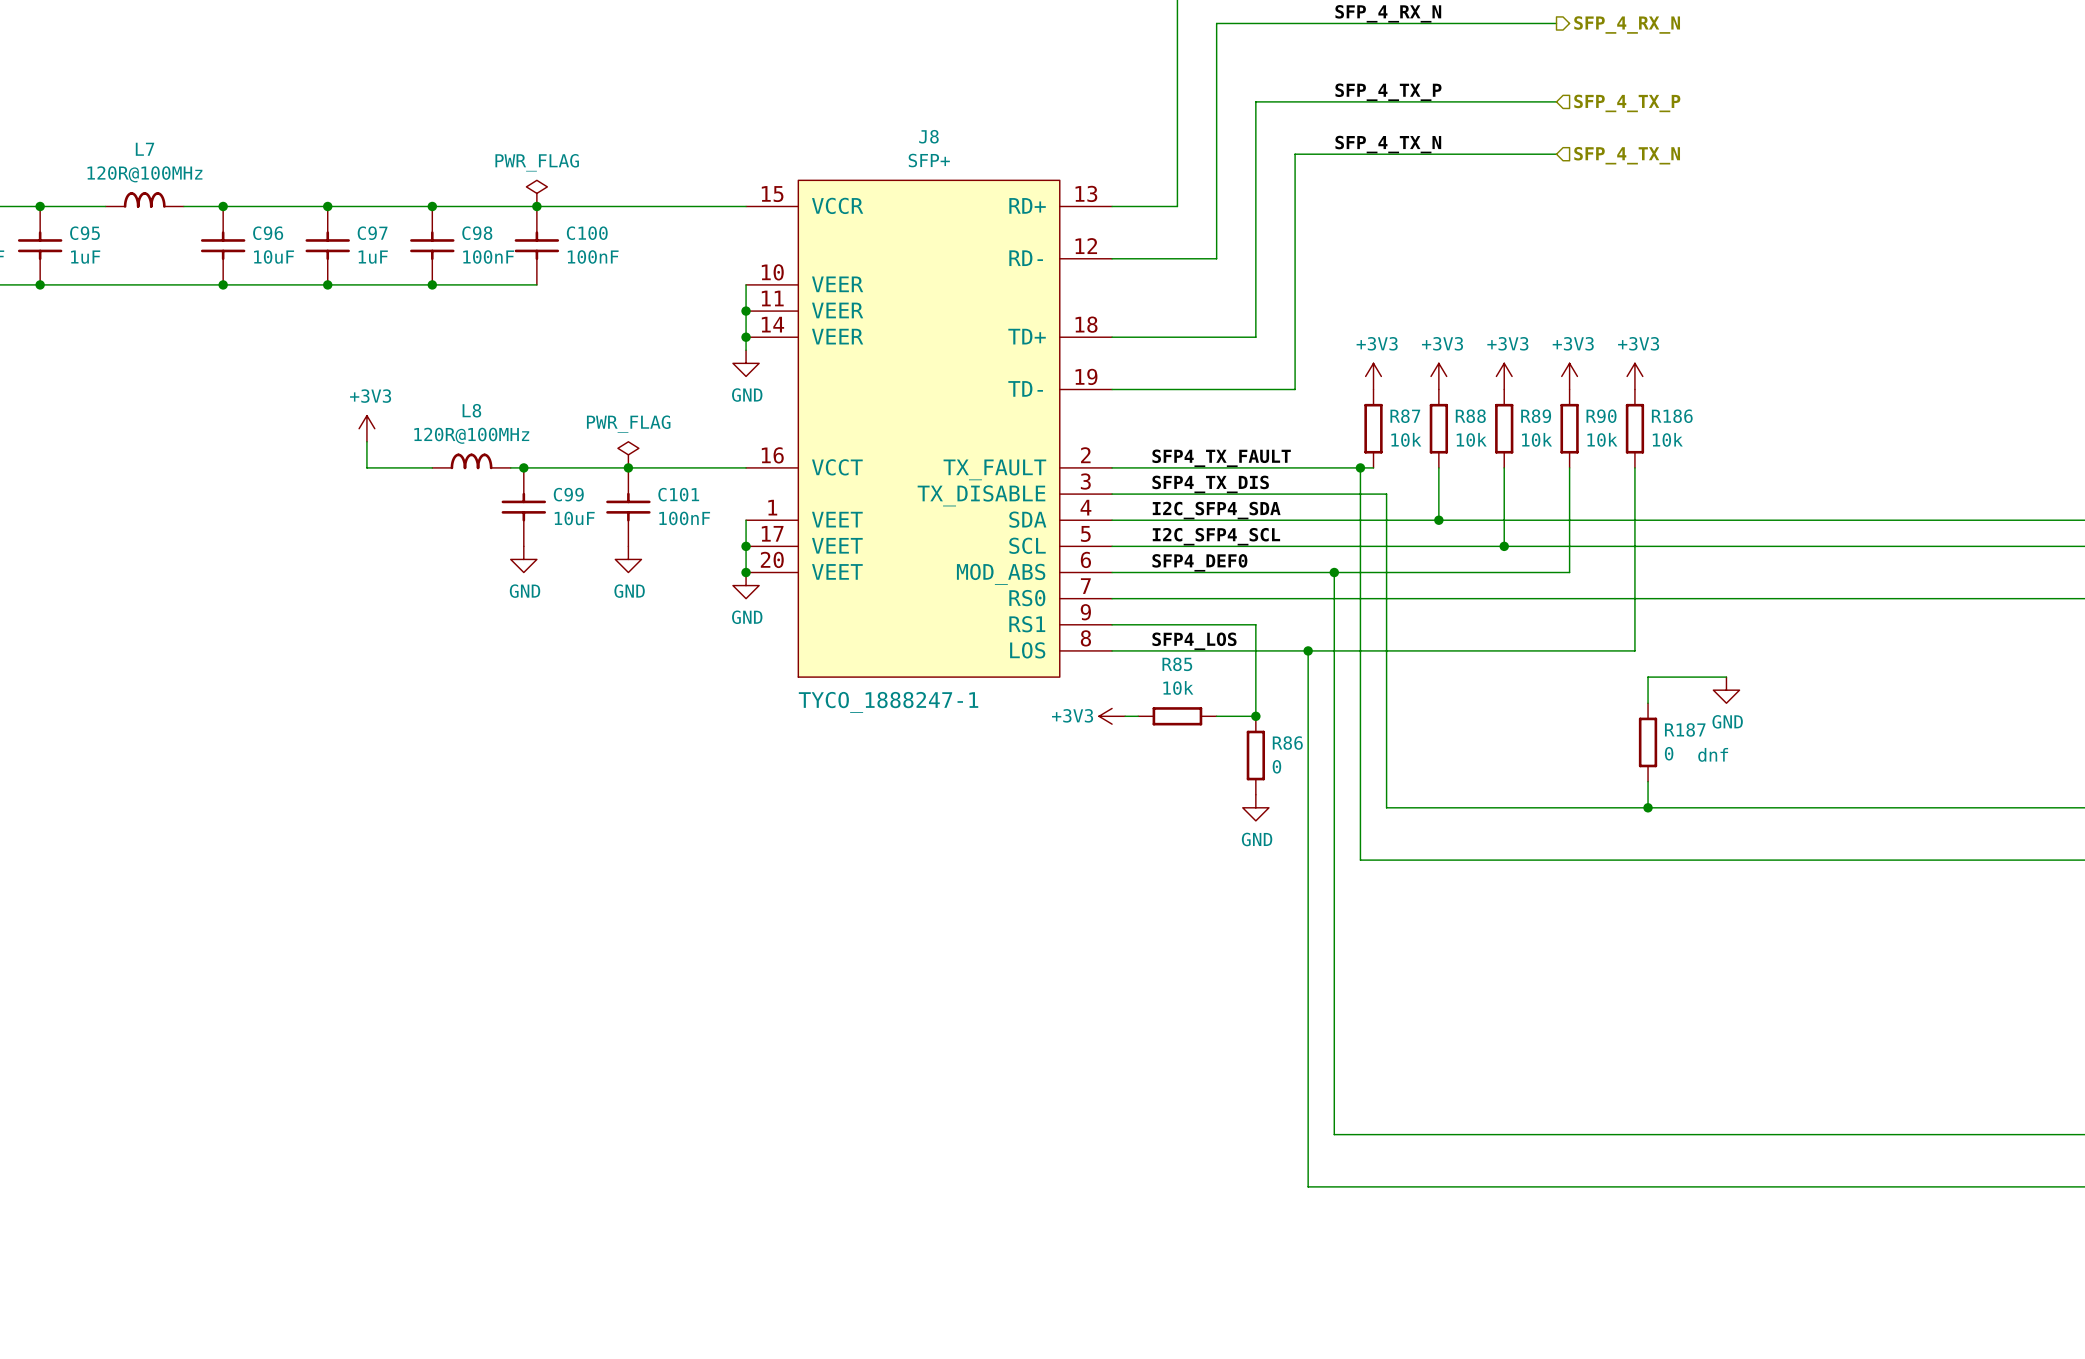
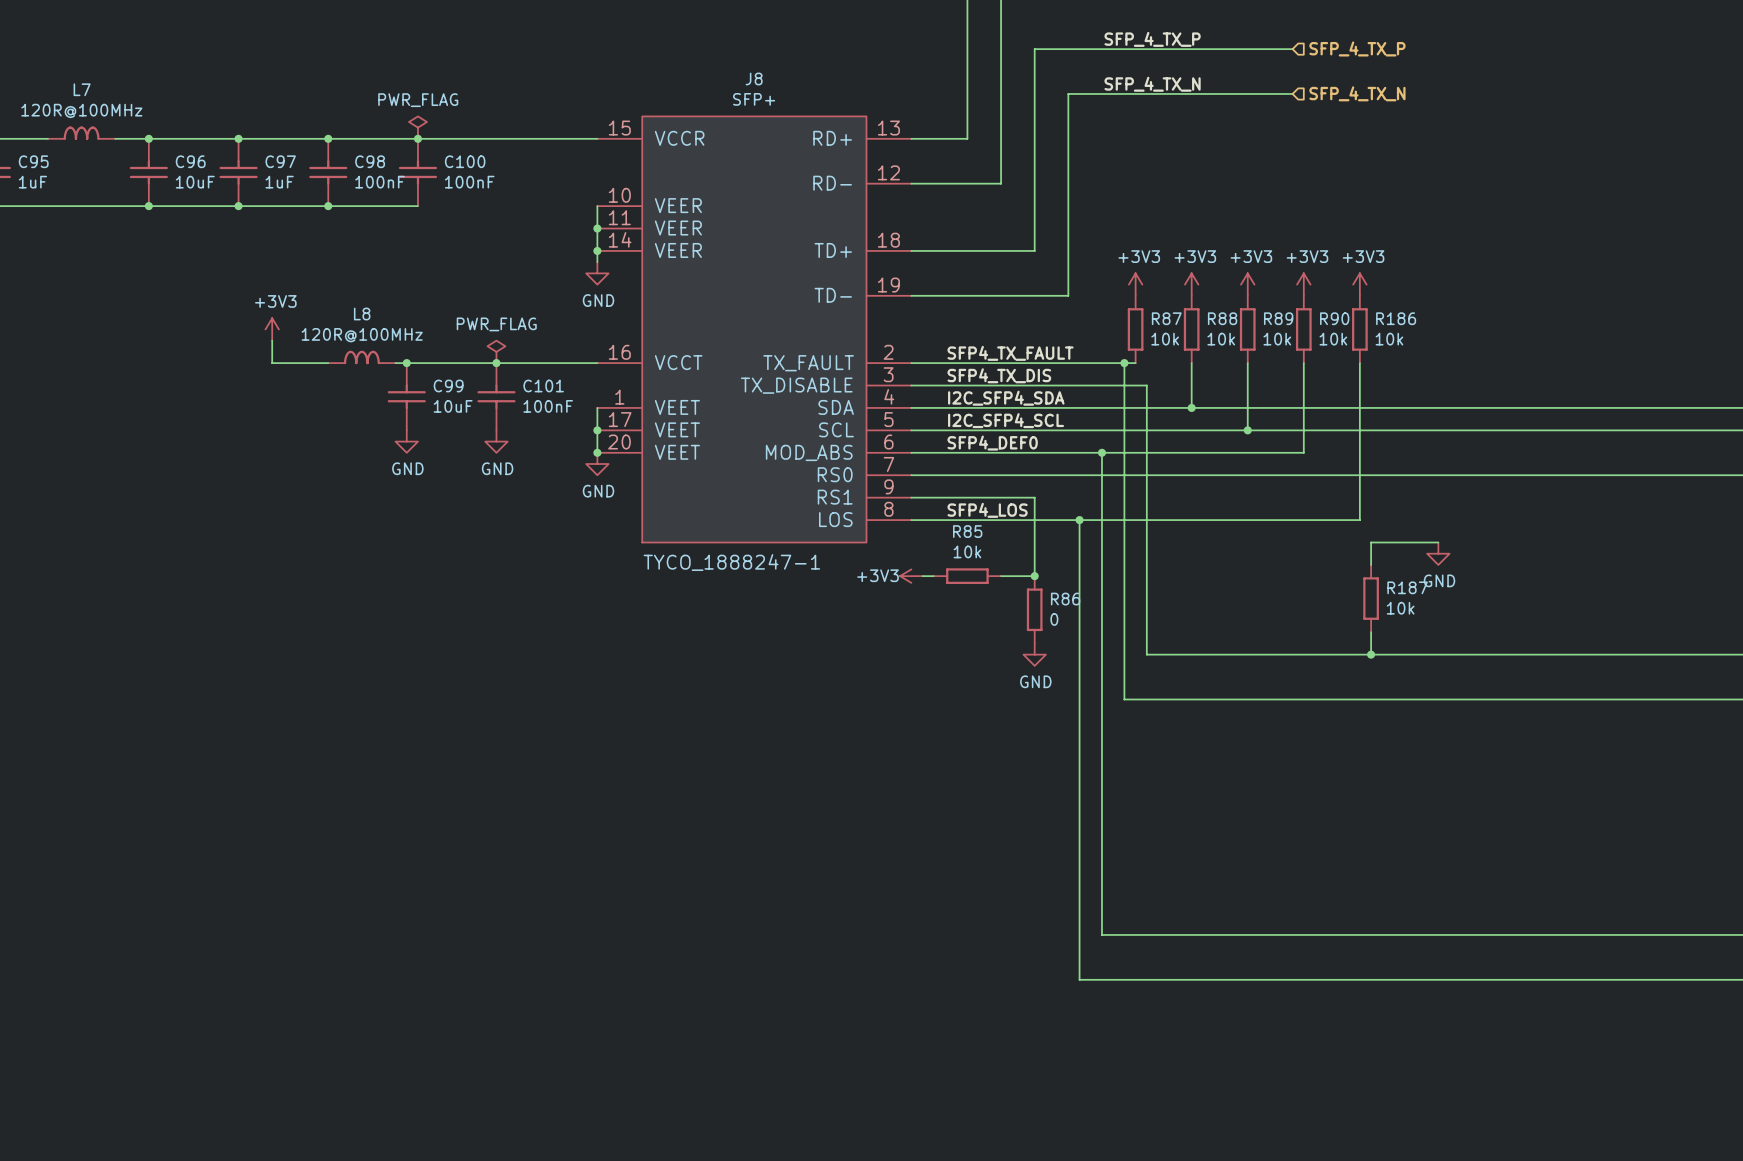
R187 text: 0 (1669, 753) -> 10k (1400, 608)
R187 text: dnf (1713, 754) -> none

